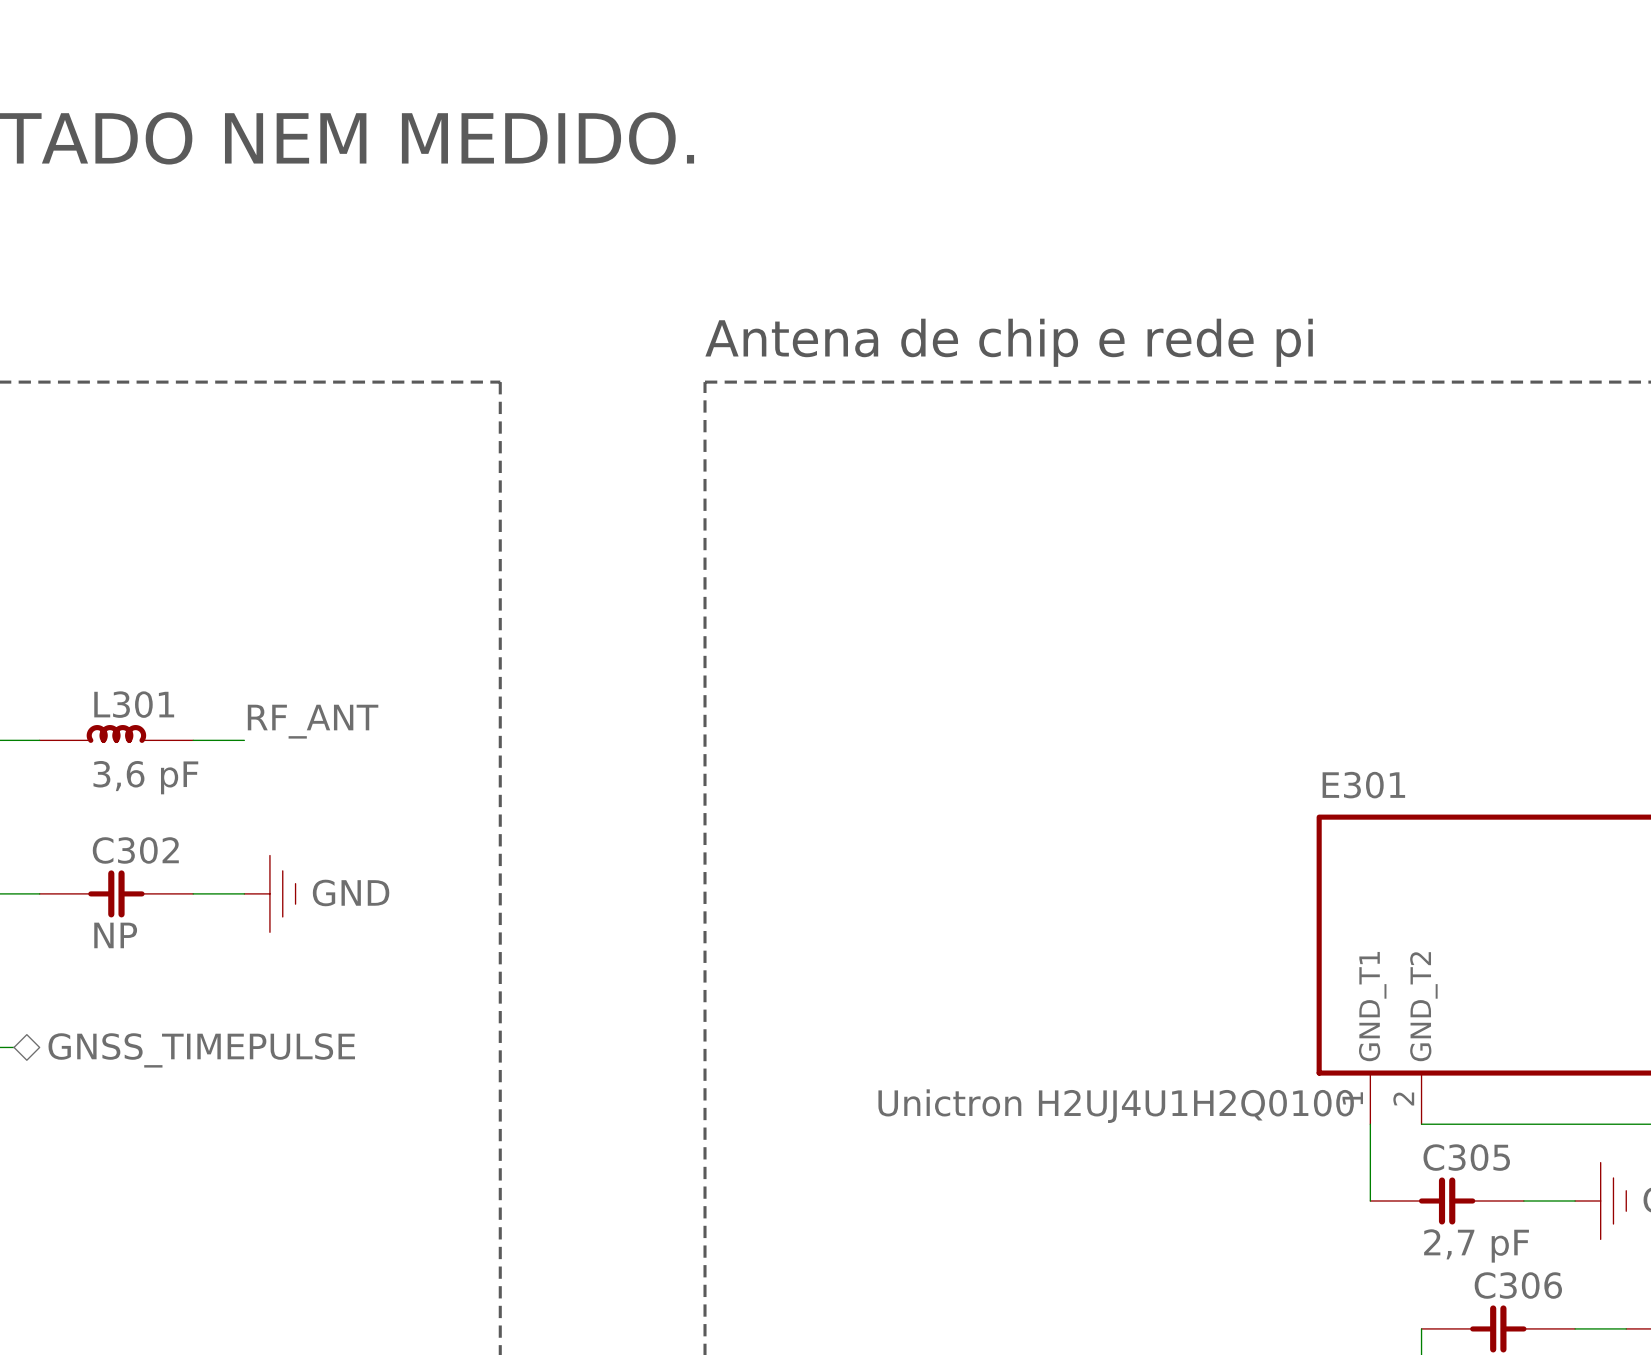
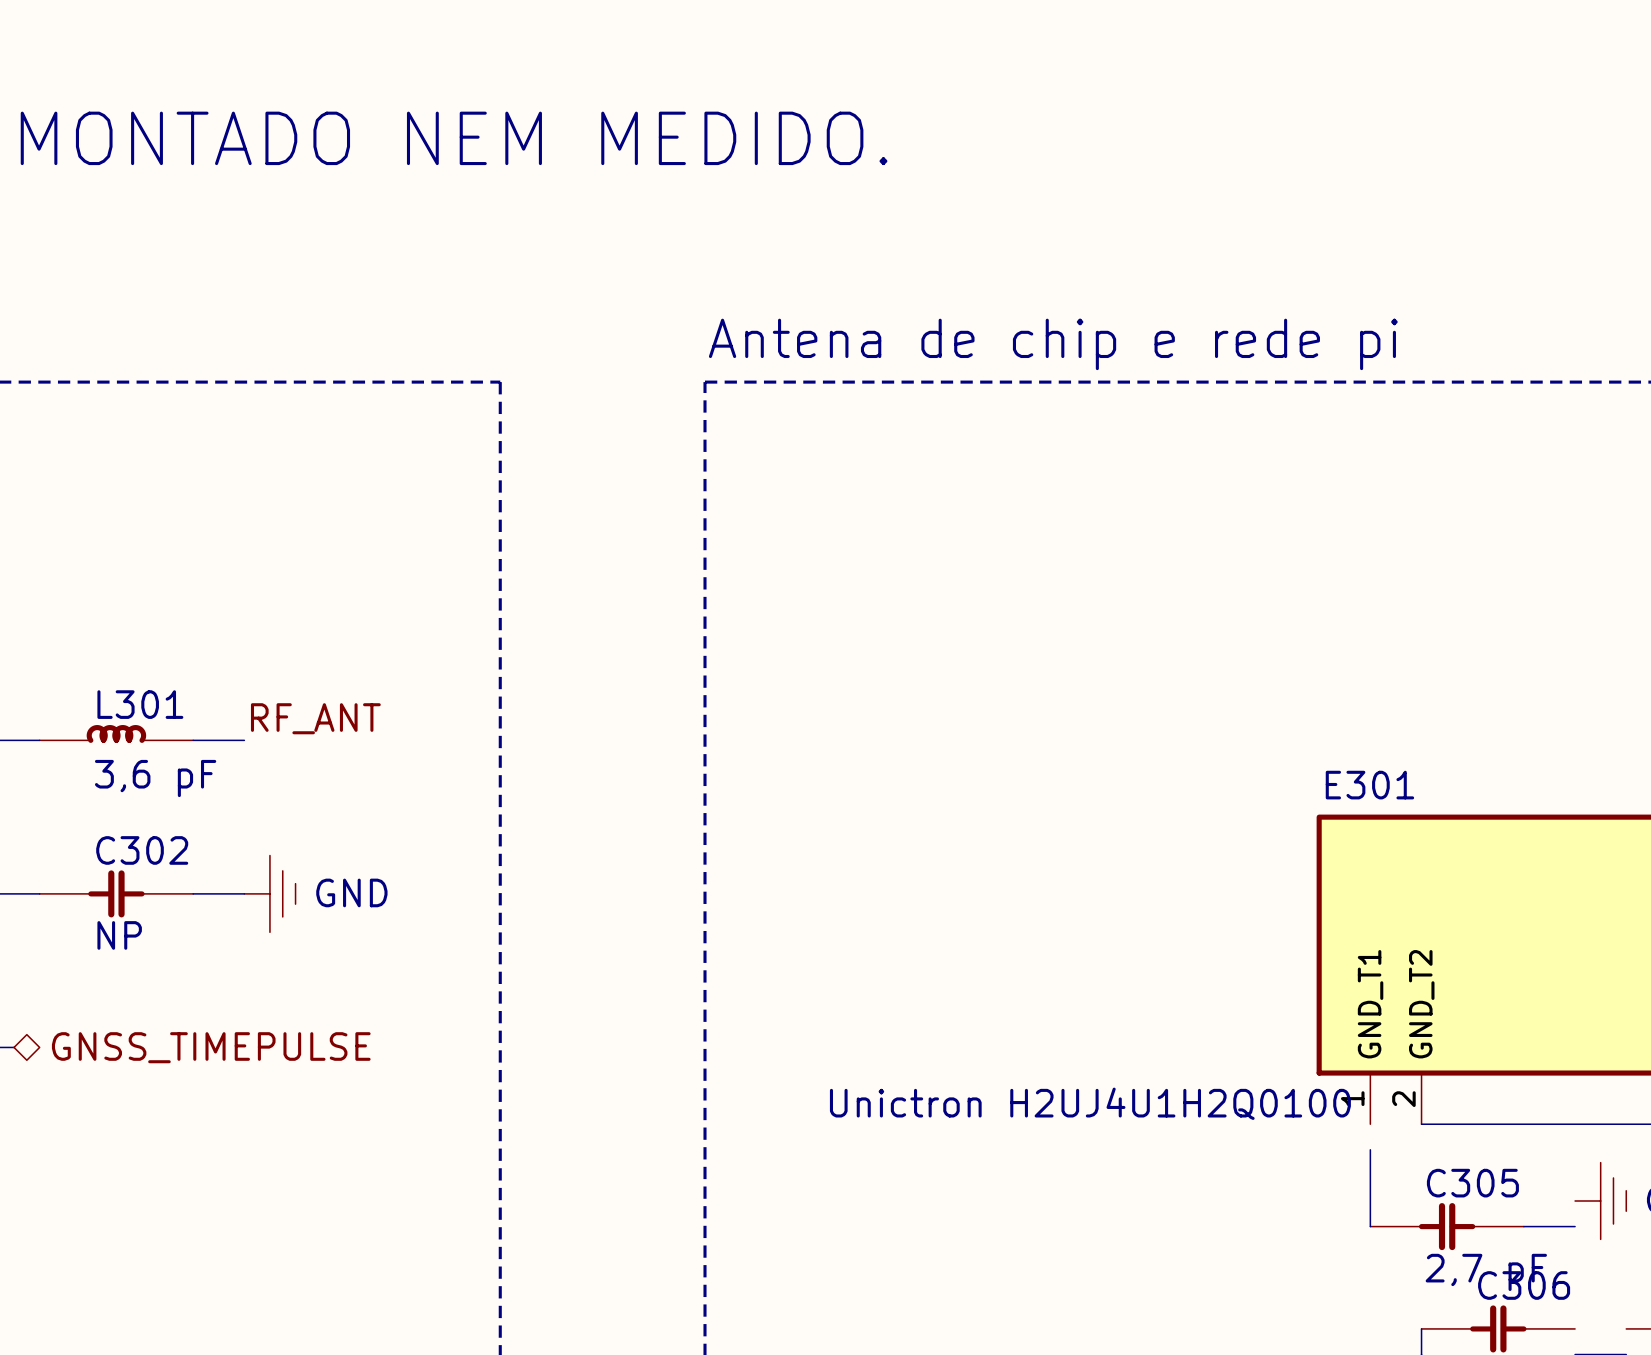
wire: (1370, 1124) (1370, 1149) -> (1370, 1200) (1370, 1226)
C305 position: (1447, 1200) -> (1447, 1226)
wire: (1523, 1200) (1575, 1200) -> (1523, 1226) (1575, 1226)
wire: (1575, 1328) (1626, 1328) -> (1575, 1354) (1626, 1354)

